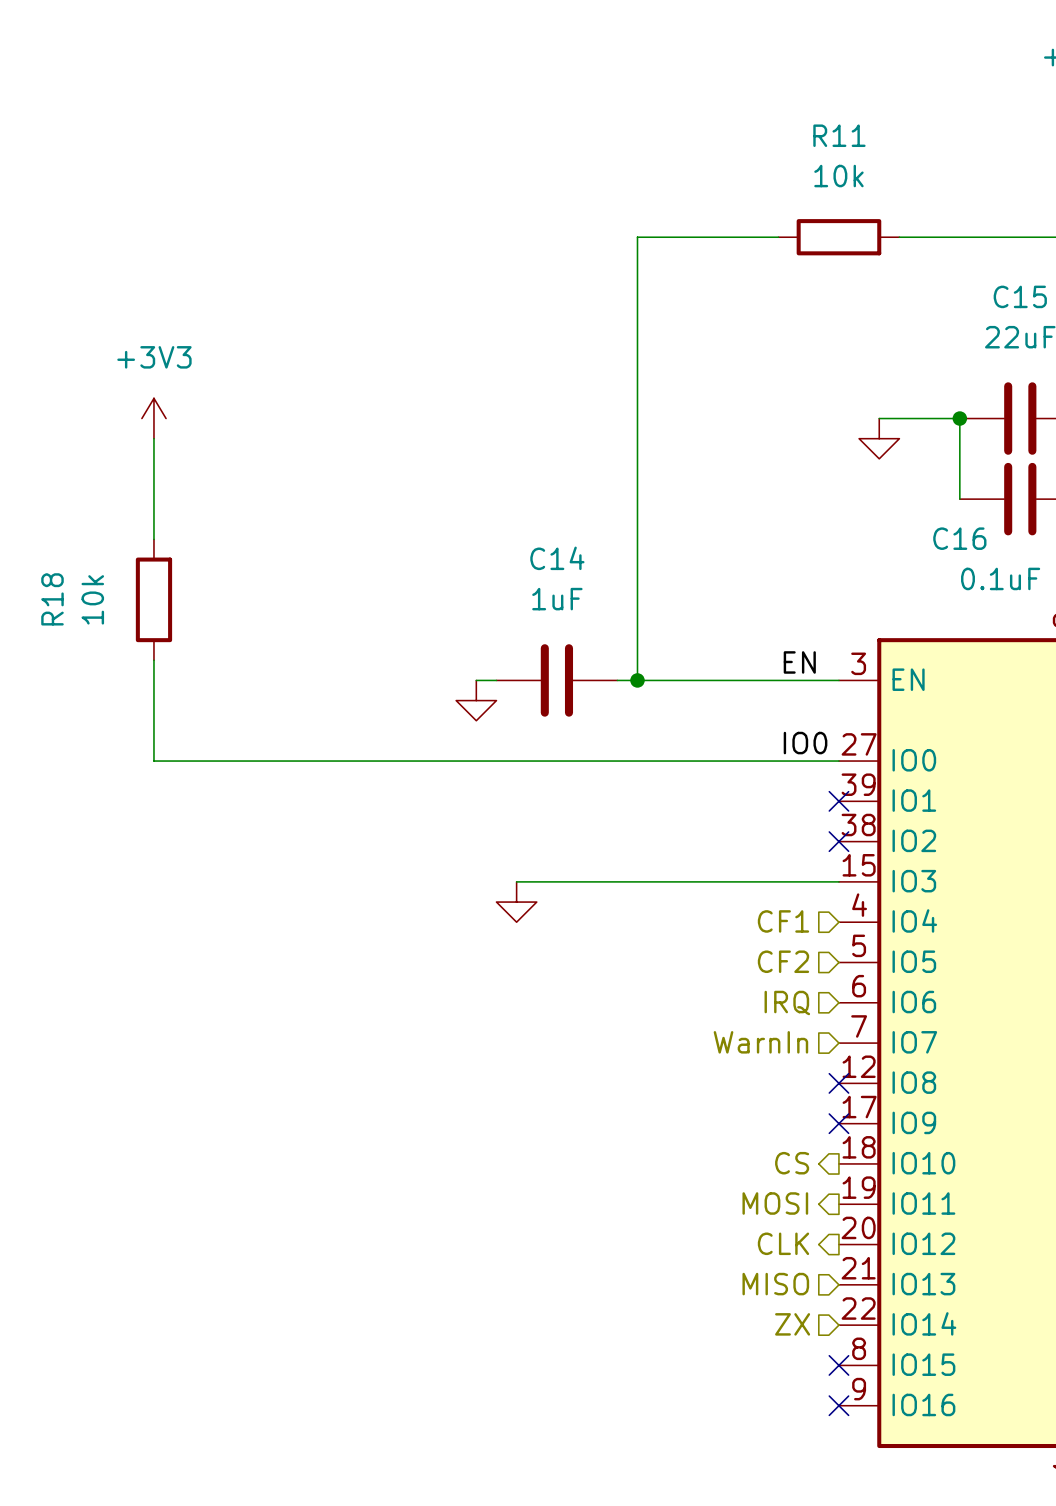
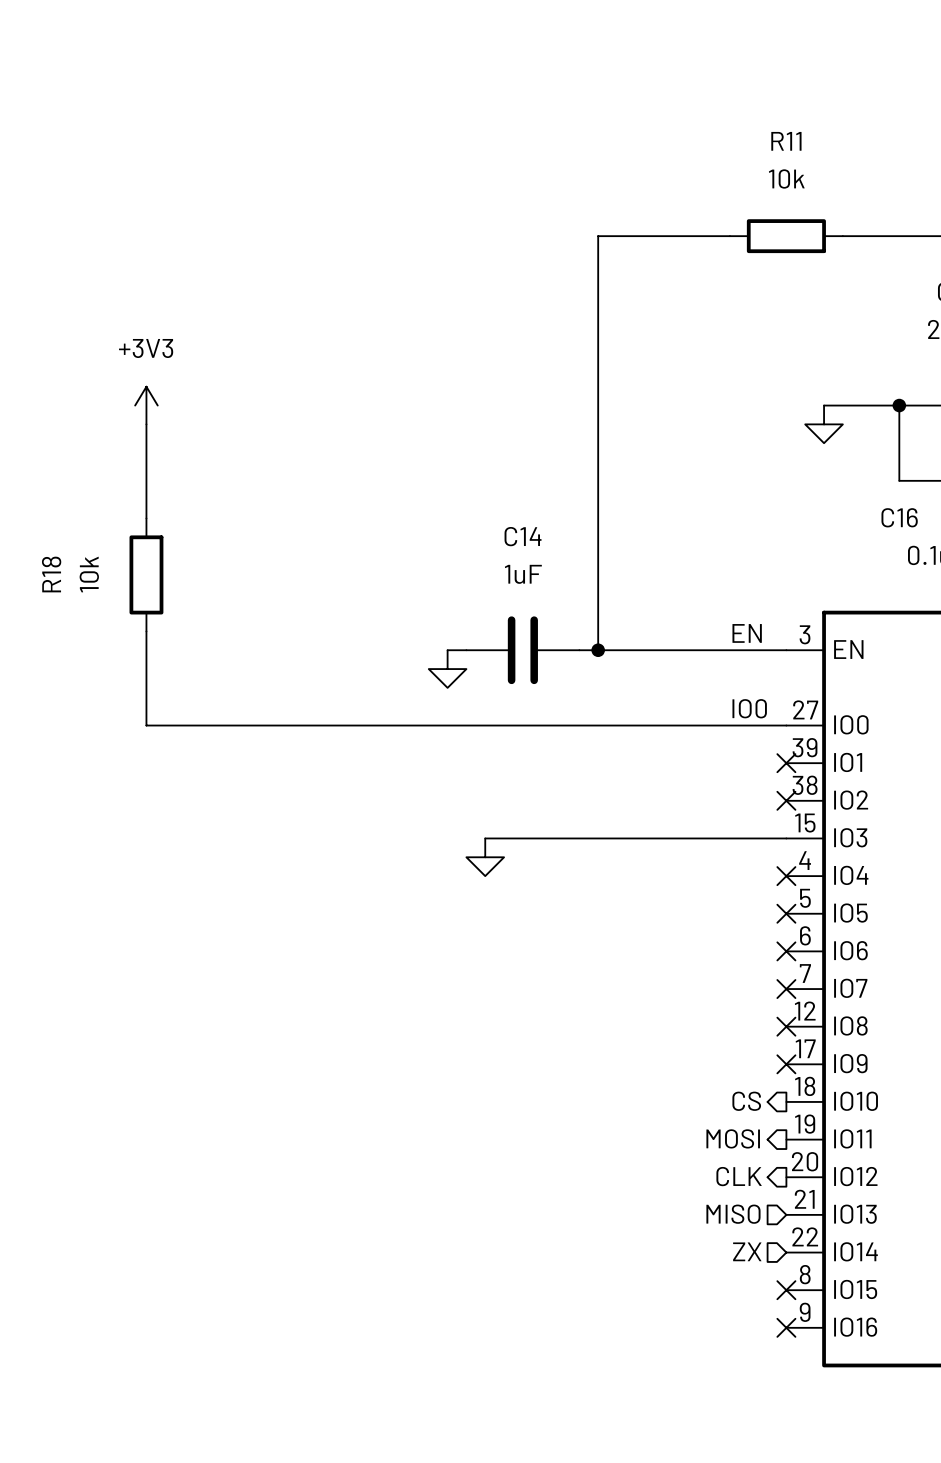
hierarchical label: CF1 (783, 921) -> none
no-connect mark: none -> (786, 876)
hierarchical label: CF2 (783, 961) -> none
no-connect mark: none -> (786, 913)
hierarchical label: IRQ (787, 1002) -> none
no-connect mark: none -> (786, 951)
hierarchical label: WarnIn (760, 1042) -> none
no-connect mark: none -> (786, 989)

